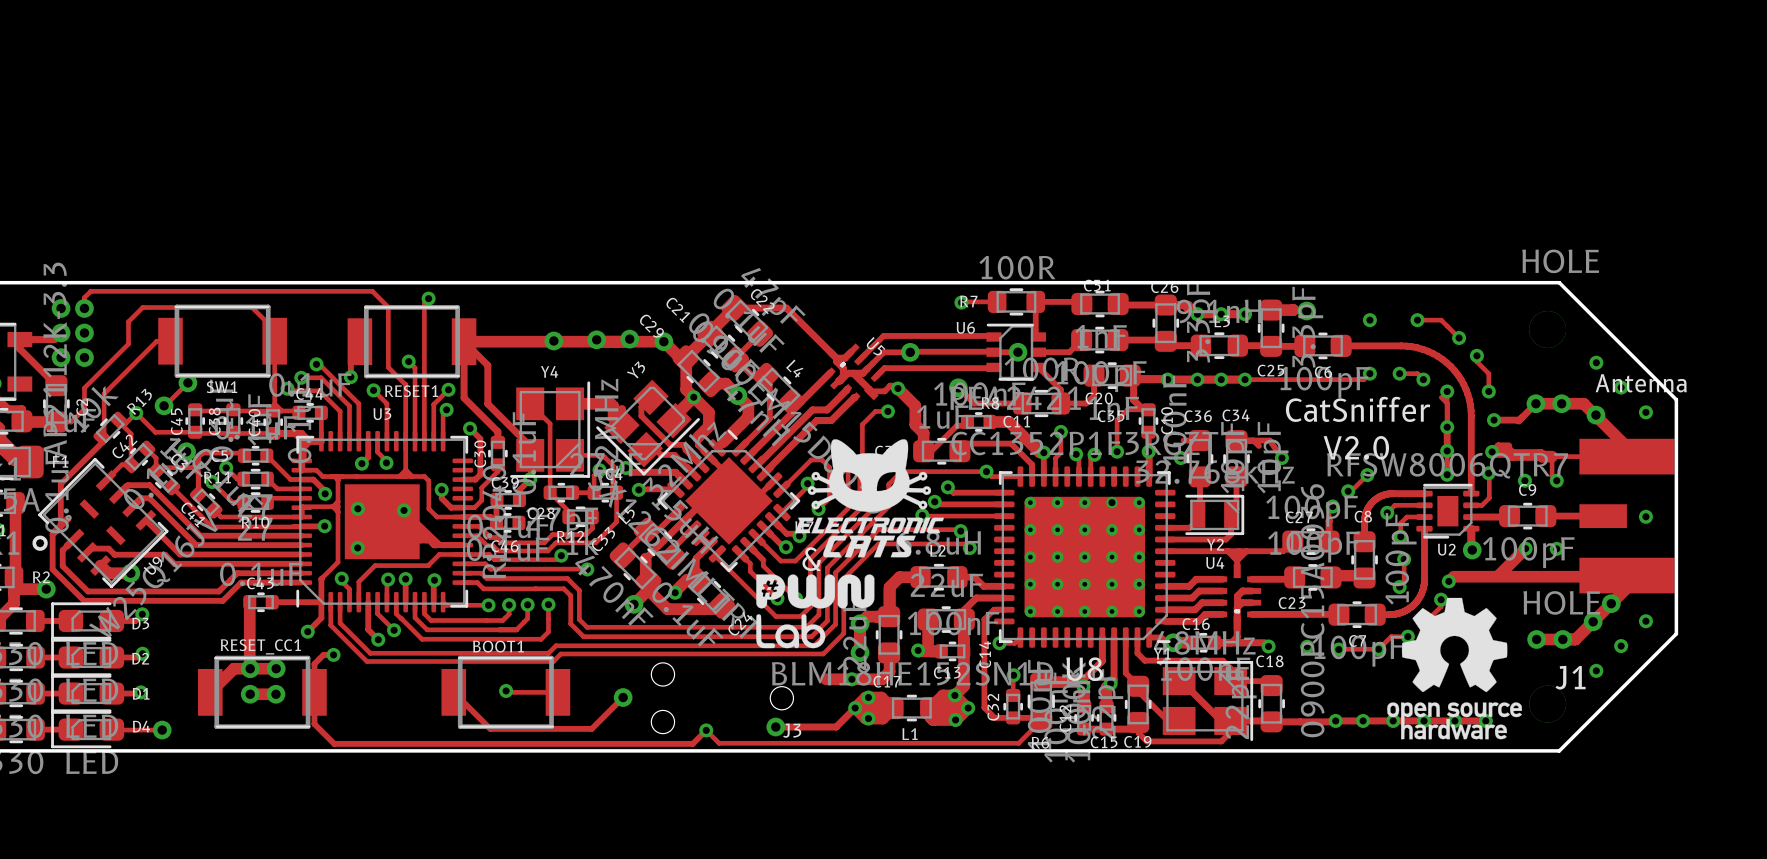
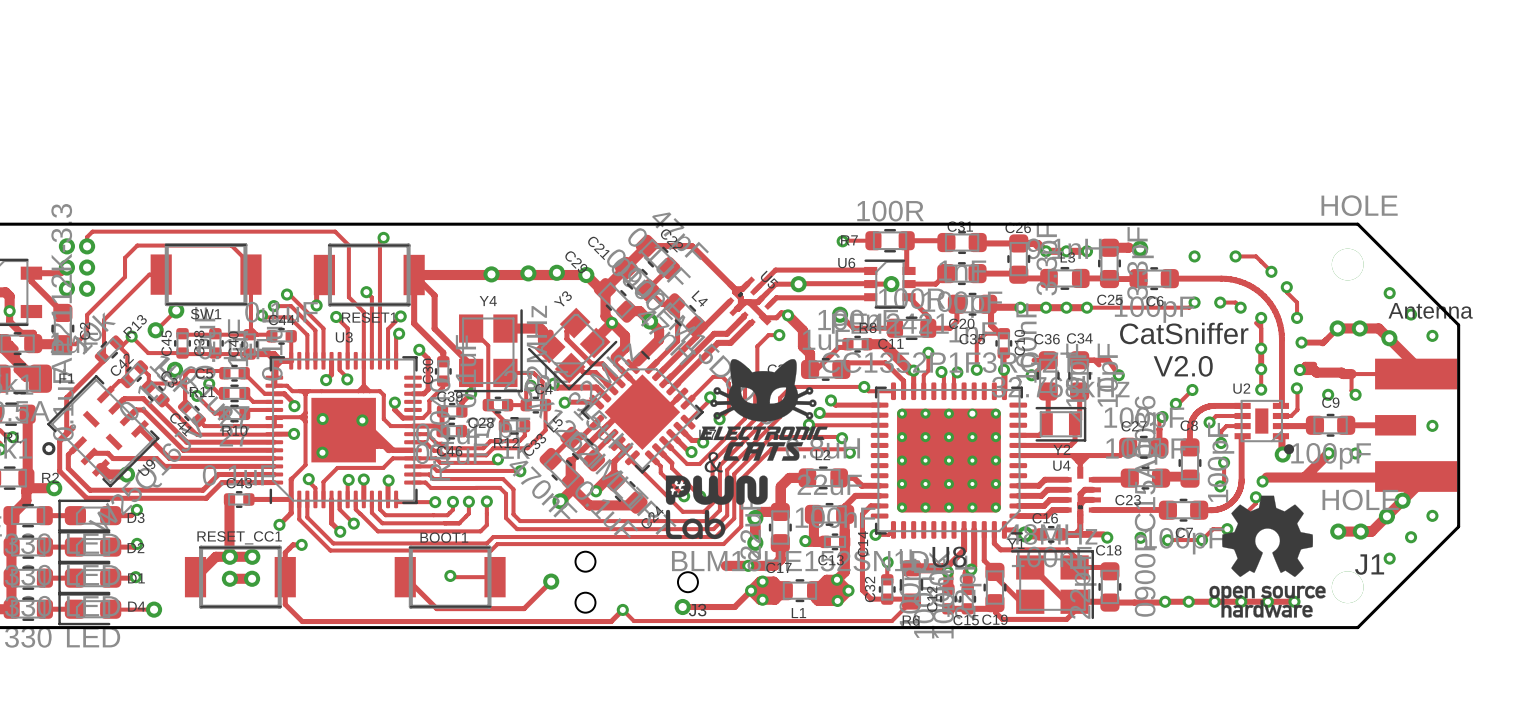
U2 value: RFSW8006QTR7 (1447, 465) -> none
U2 footprint: [1416, 483, 1480, 539] -> [1234, 399, 1295, 455]
U2 name position: U2 (1446, 549) -> U2 (1241, 388)

